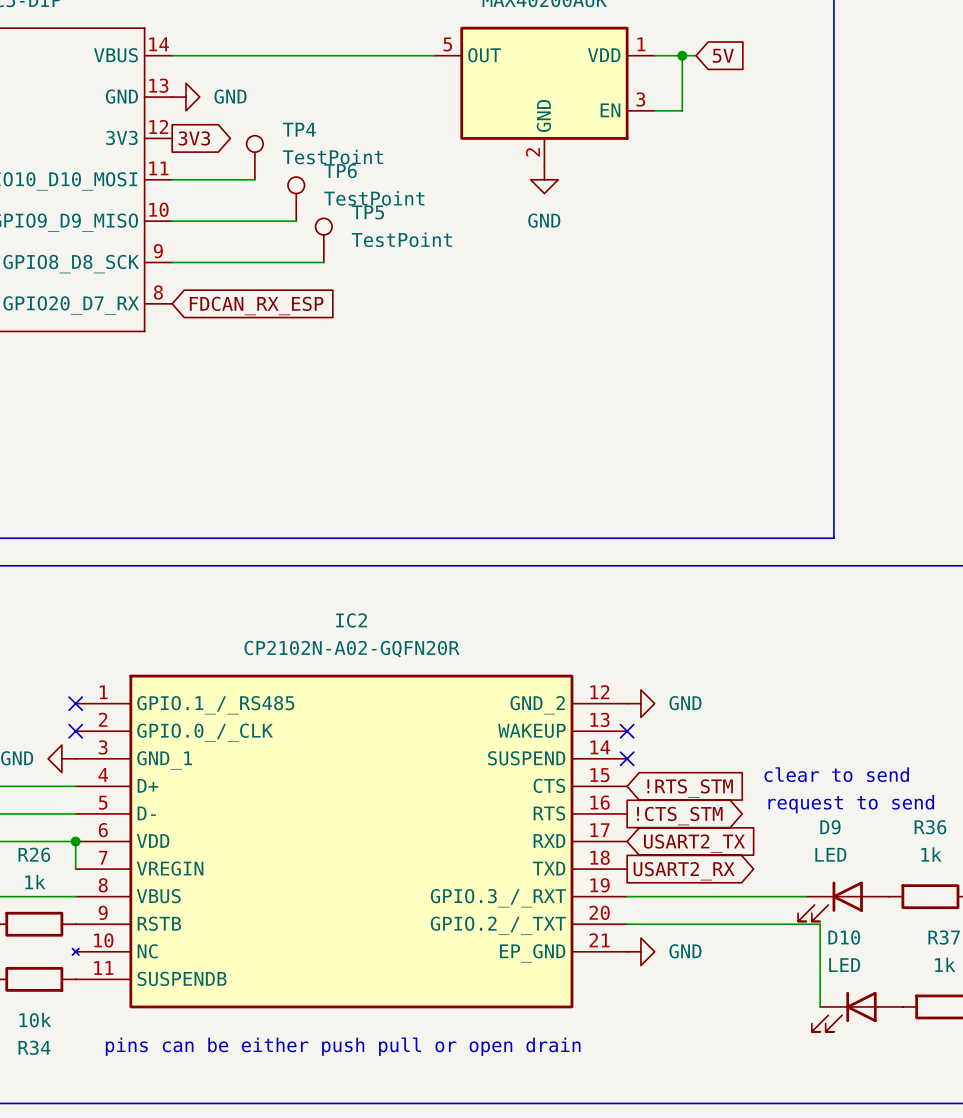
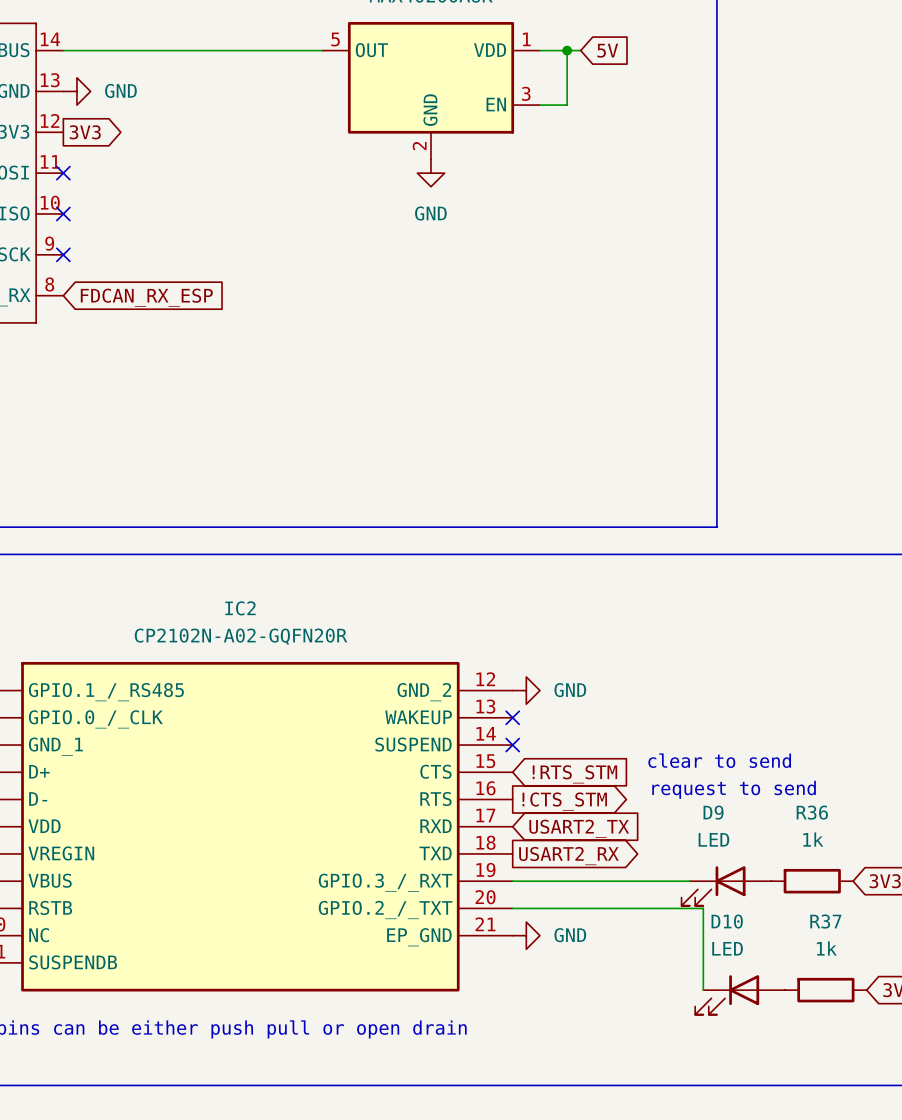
TP4: TestPoint (254, 157) -> none
wire: (172, 179) (254, 179) -> none
no-connect mark: none -> (63, 173)
TP6: TestPoint (296, 199) -> none
wire: (172, 221) (296, 221) -> none
no-connect mark: none -> (63, 213)
TP5: TestPoint (323, 240) -> none
wire: (172, 262) (323, 262) -> none
no-connect mark: none -> (63, 254)

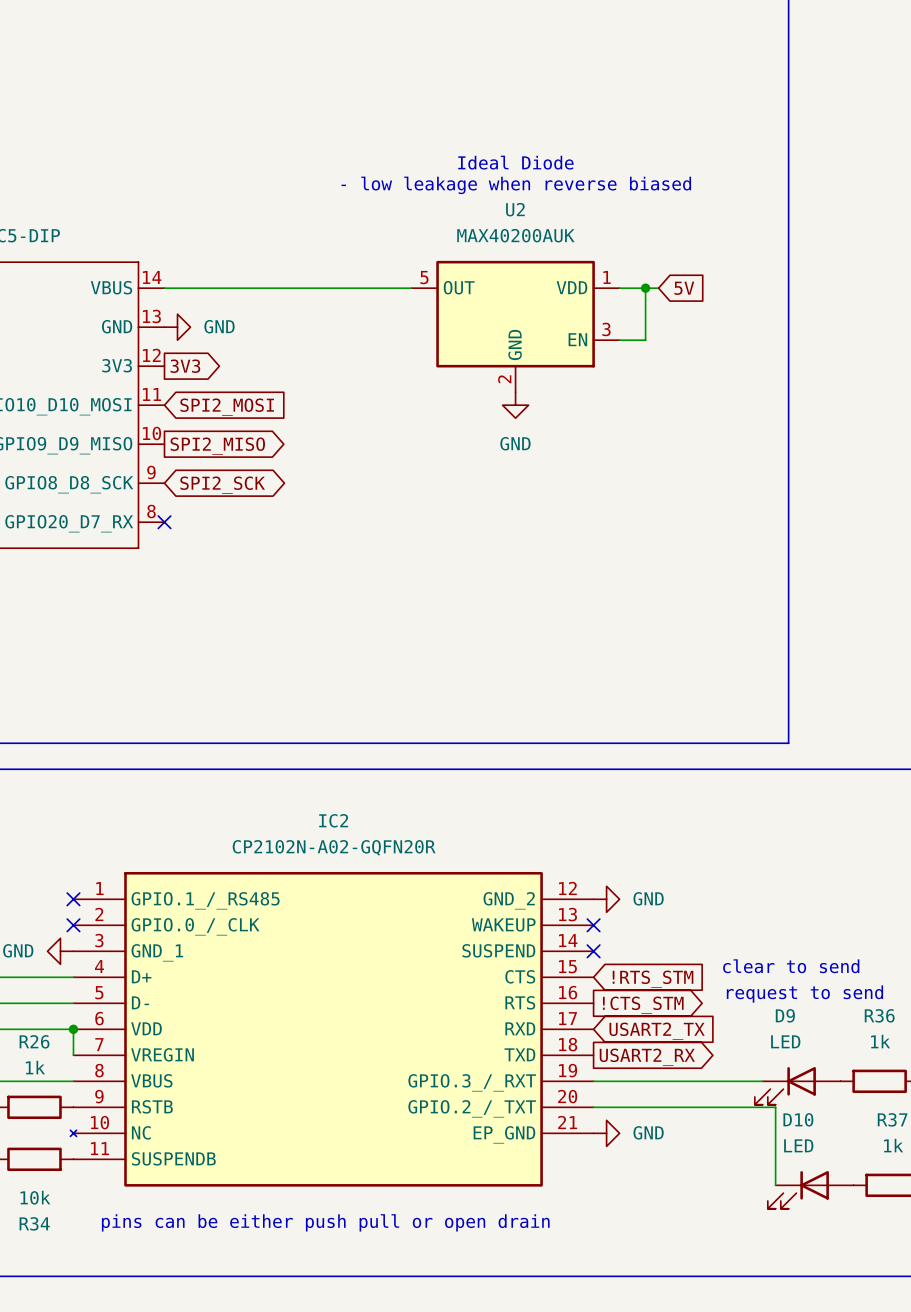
no-connect mark: (63, 173) -> none
global label: none -> SPI2_MOSI (227, 407)
no-connect mark: (63, 213) -> none
global label: none -> SPI2_MISO (217, 446)
no-connect mark: (63, 254) -> none
global label: none -> SPI2_SCK (222, 485)
no-connect mark: none -> (164, 522)
global label: FDCAN_RX_ESP (146, 297) -> none

